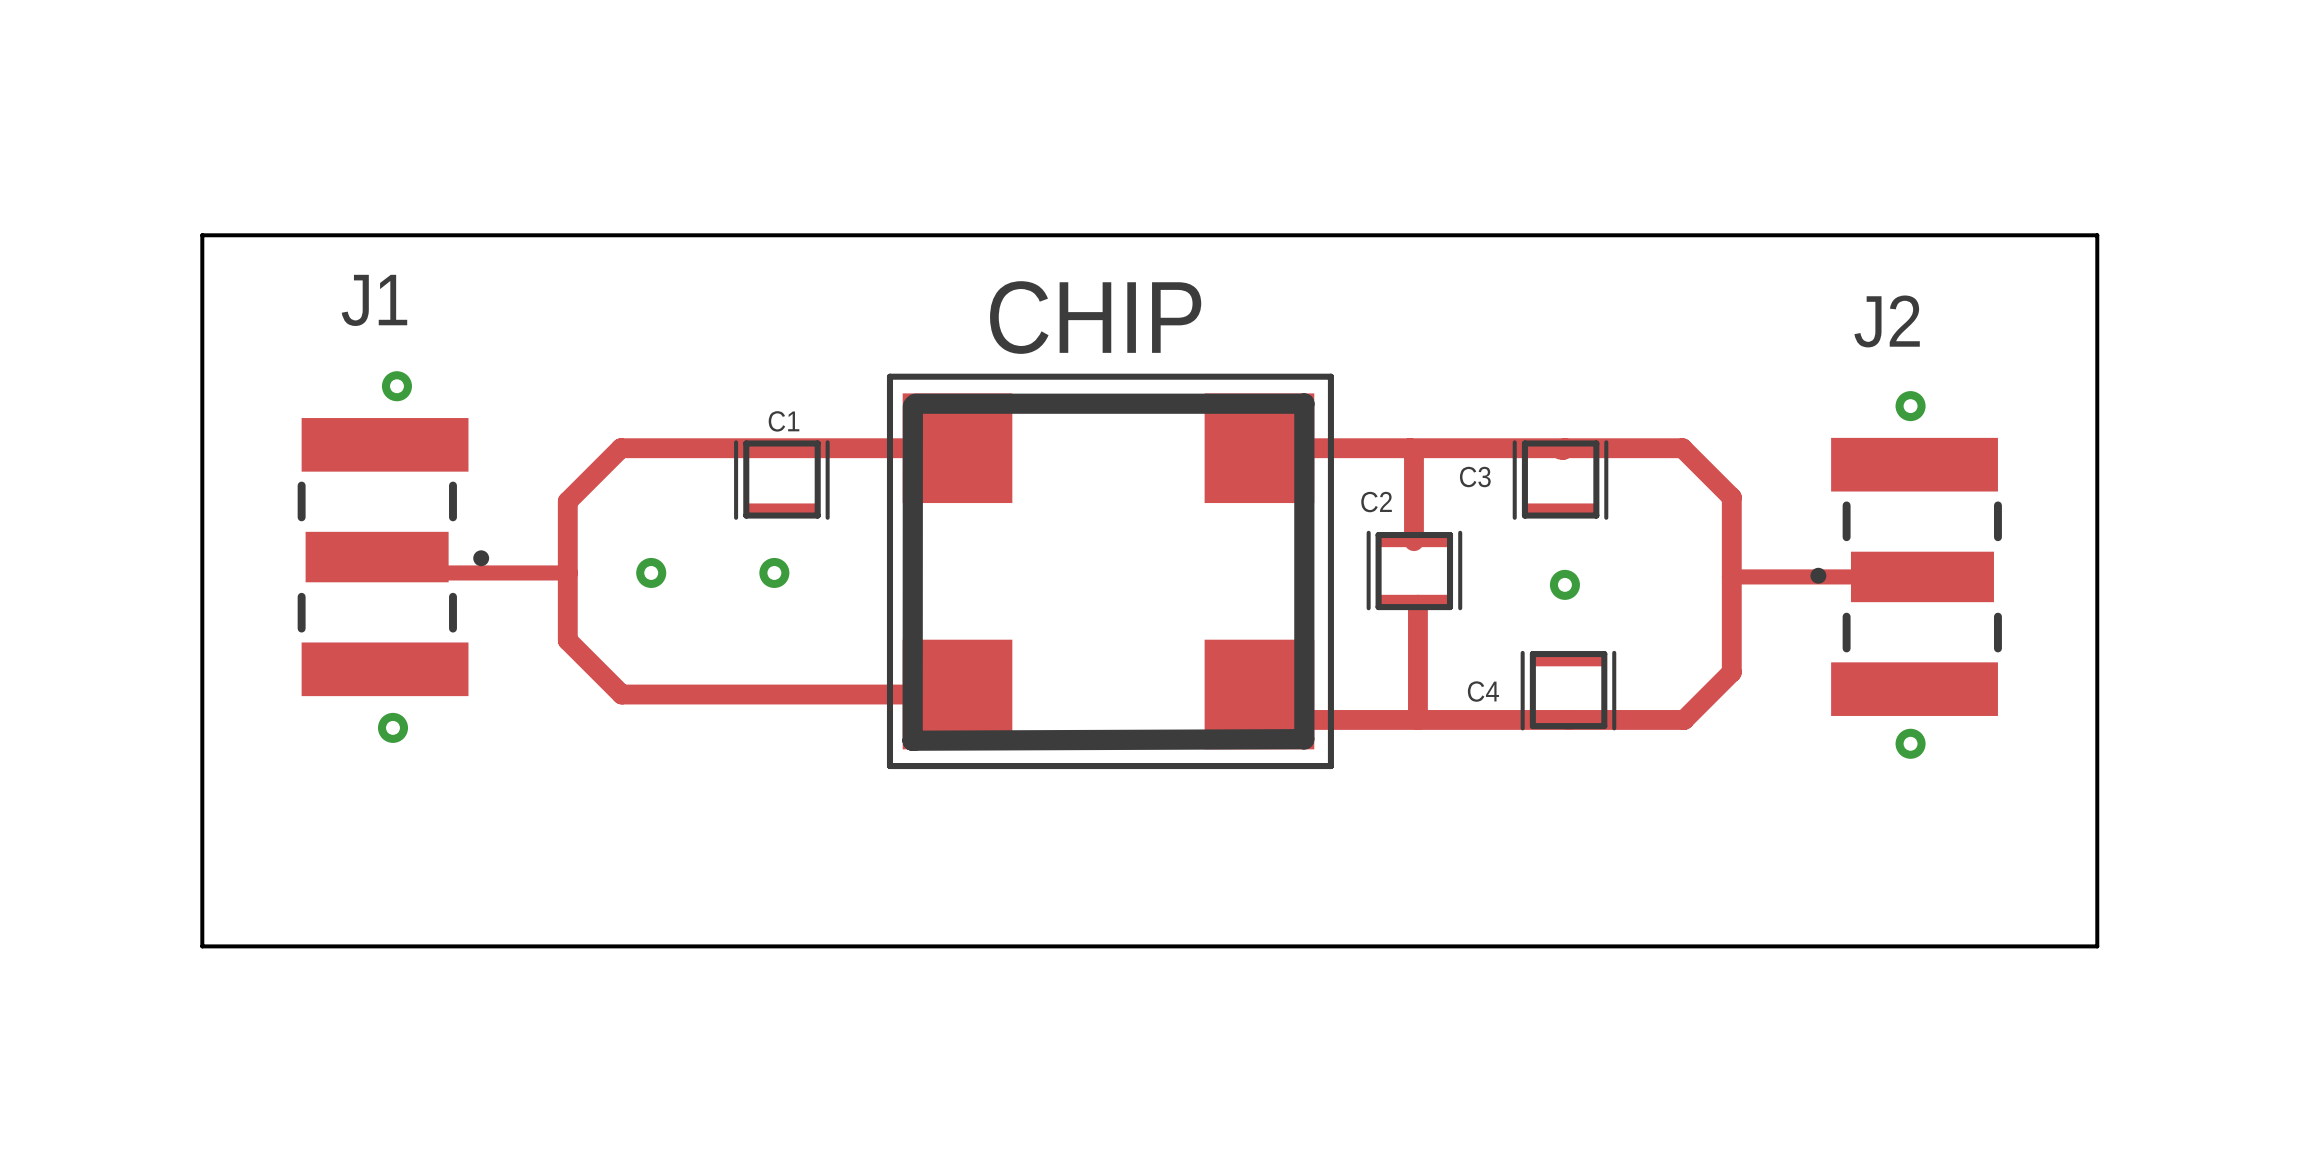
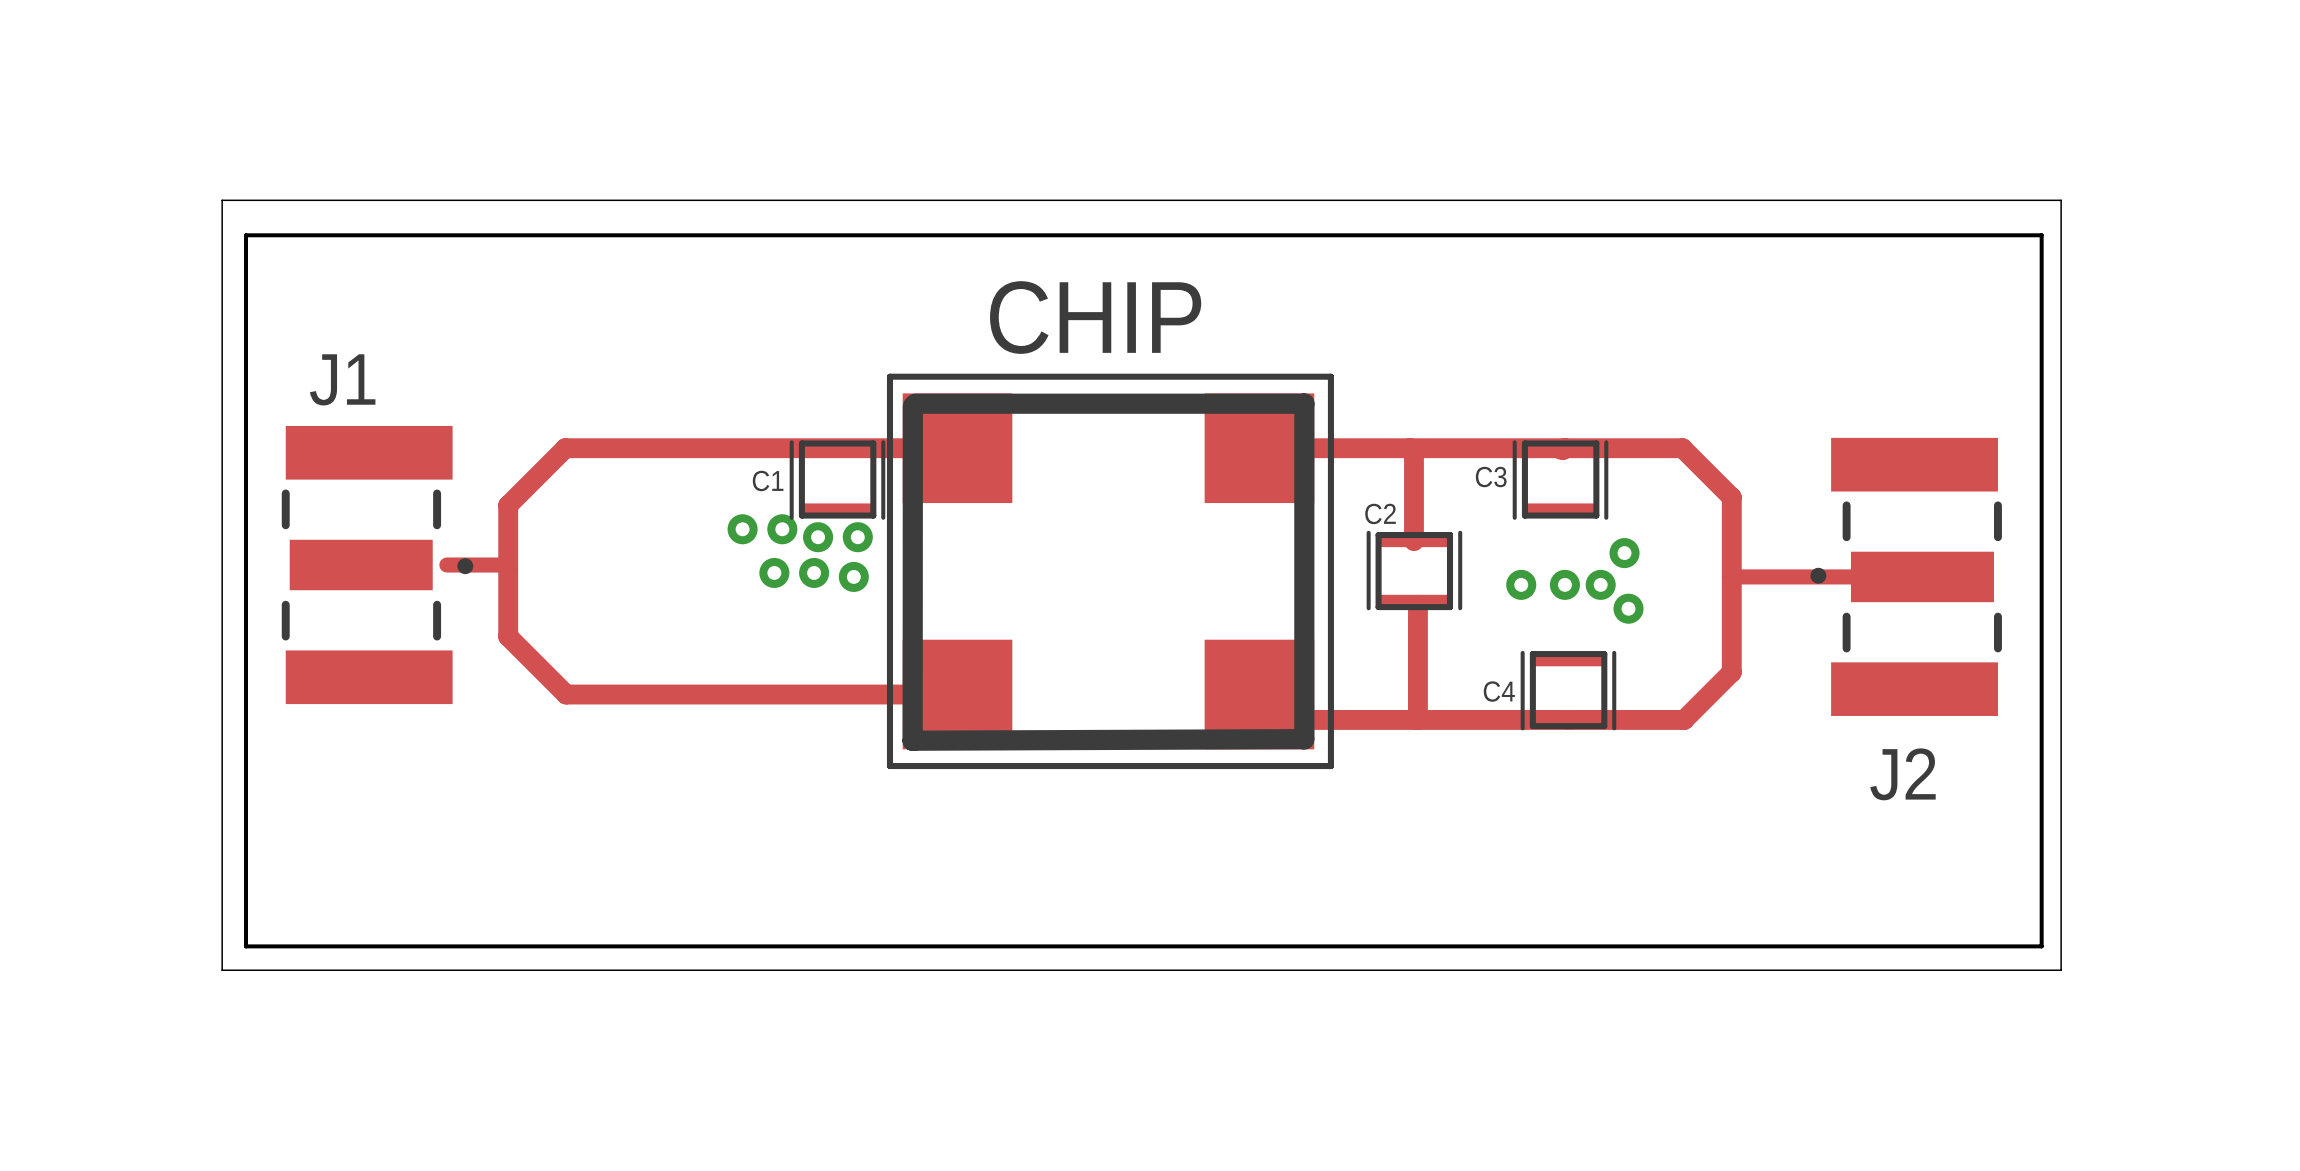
board edge: none -> (222, 200) (2061, 200) (2061, 970) (222, 970) (222, 200)
board edge: (246, 235) (202, 235) (202, 946) (246, 946) -> (246, 235) (246, 946)
board edge: (2041, 235) (2097, 235) (2097, 946) (2041, 946) -> (2041, 235) (2041, 946)
J1 name position: J1 (374, 300) -> J1 (342, 379)
J2 name position: J2 (1887, 321) -> J2 (1903, 774)
via: (396, 386) -> none
via: (1910, 406) -> none
C1 name position: C1 (784, 421) -> C1 (768, 480)
track: (621, 448) (567, 501) (567, 640) (621, 694) -> (621, 448) (565, 448) (508, 505) (508, 636) (566, 694) (621, 694)
C3 name position: C3 (1475, 477) -> C3 (1491, 477)
C1 position: (781, 480) -> (837, 480)
C2 name position: C2 (1376, 502) -> C2 (1380, 513)
via: none -> (742, 529)
via: none -> (782, 529)
via: none -> (818, 537)
via: none -> (857, 537)
via: none -> (1624, 553)
J1 position: (393, 557) -> (377, 565)
track: none -> (446, 565) (504, 565) (508, 568)
track: (395, 572) (567, 572) -> none
via: (651, 572) -> none
via: none -> (814, 572)
via: none -> (853, 576)
via: none -> (1521, 584)
via: none -> (1600, 584)
via: none -> (1628, 608)
C4 name position: C4 (1483, 691) -> C4 (1499, 691)
via: (392, 727) -> none
via: (1910, 743) -> none

